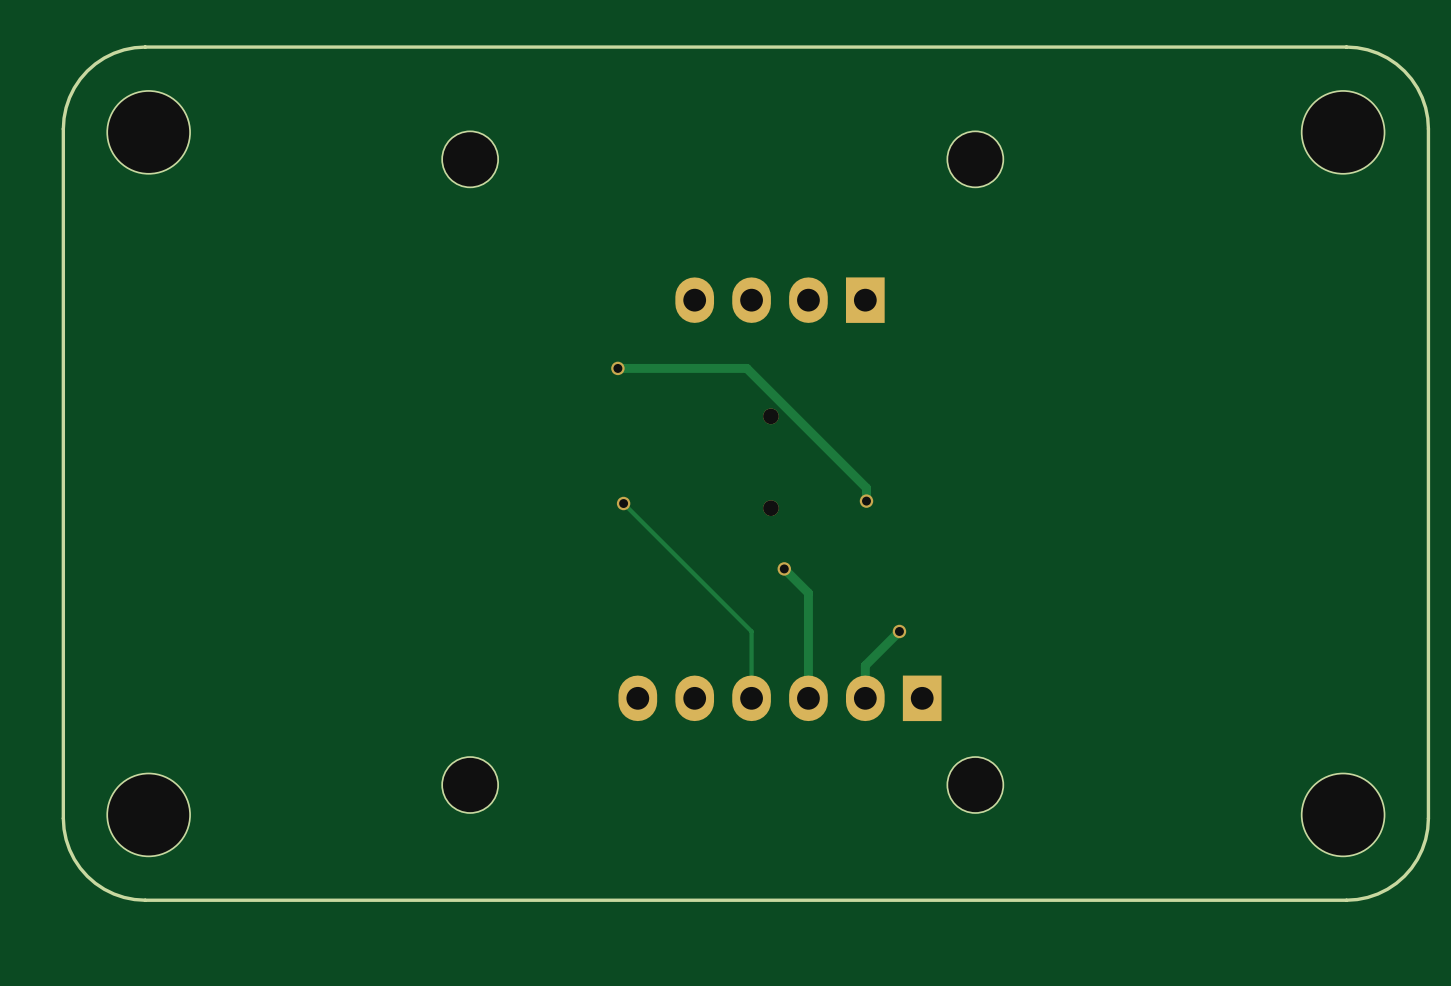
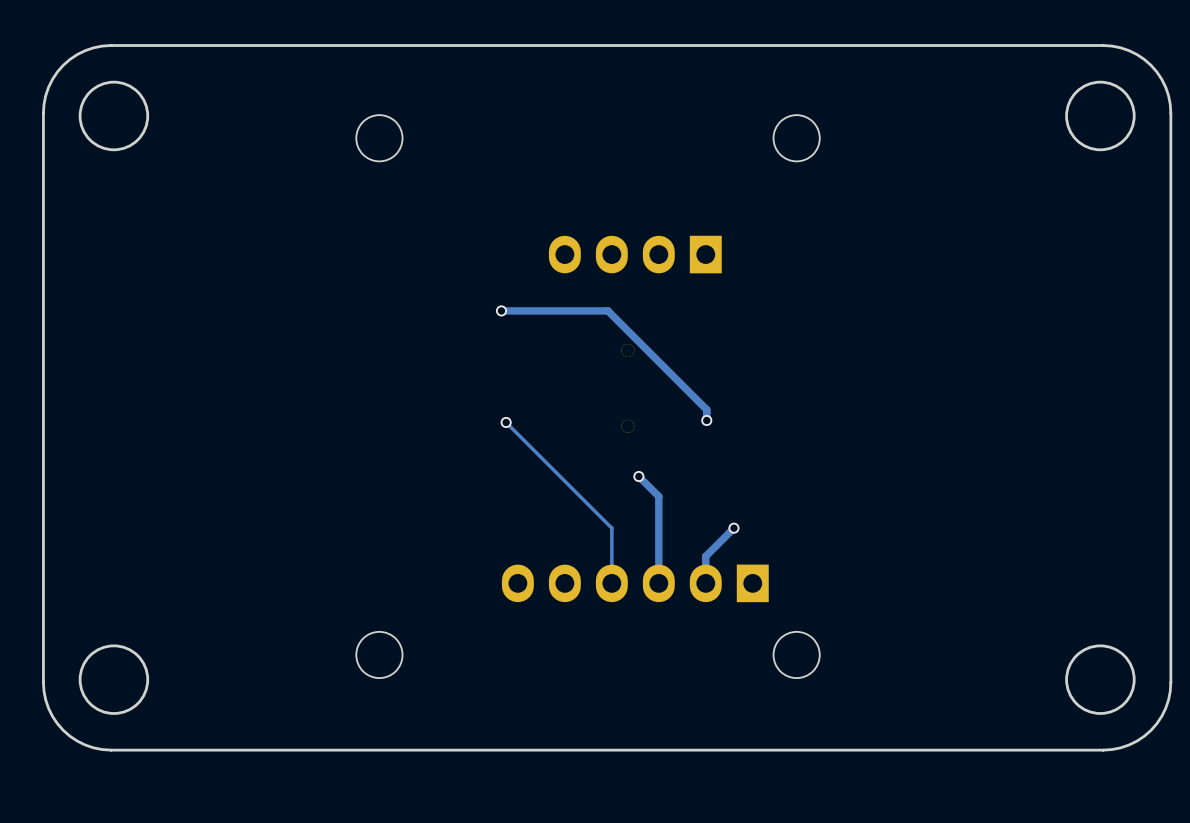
round board edge: none -> [78, 80, 150, 152]
round board edge: none -> [1065, 80, 1136, 152]
part: (148, 132) -> none
part: (1343, 132) -> none
round board edge: none -> [78, 644, 150, 715]
round board edge: none -> [1065, 644, 1136, 715]
part: (148, 814) -> none
part: (1343, 814) -> none

